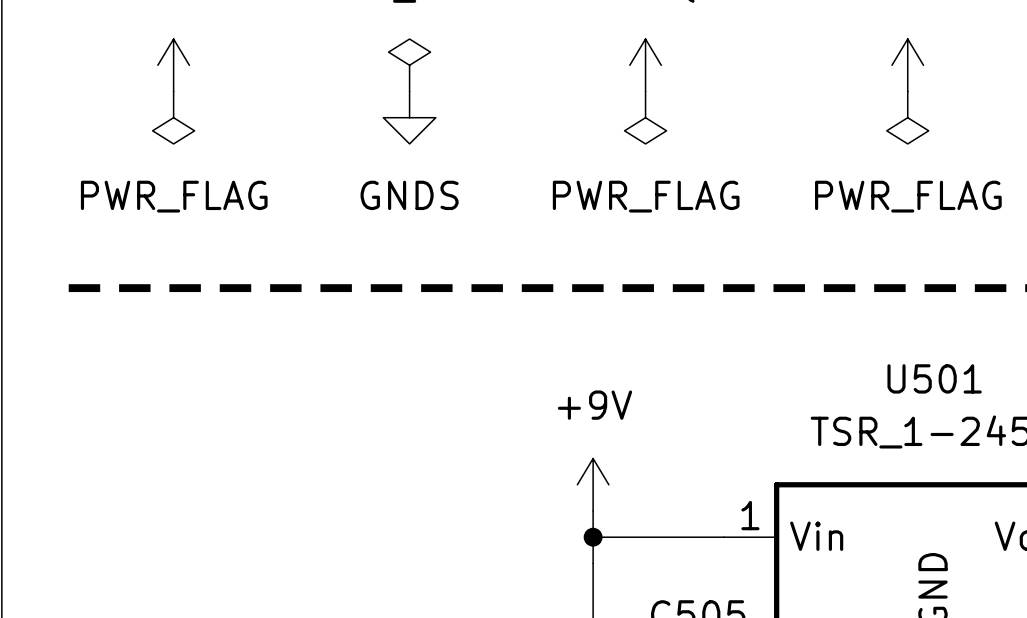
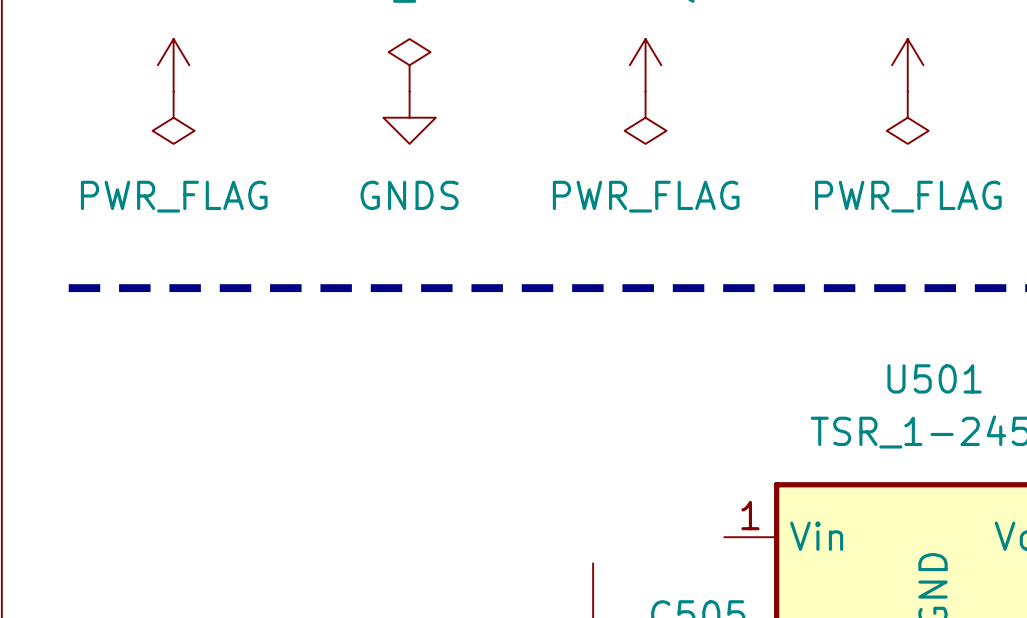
power symbol: +9V (593, 484) -> none
wire: (593, 510) (593, 563) -> none
wire: (593, 537) (724, 537) -> none
junction: (593, 537) -> none

